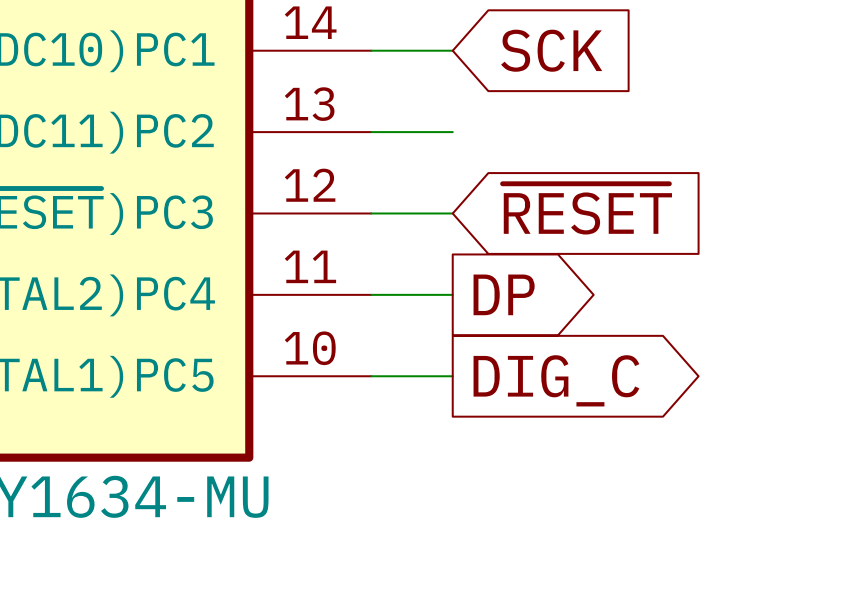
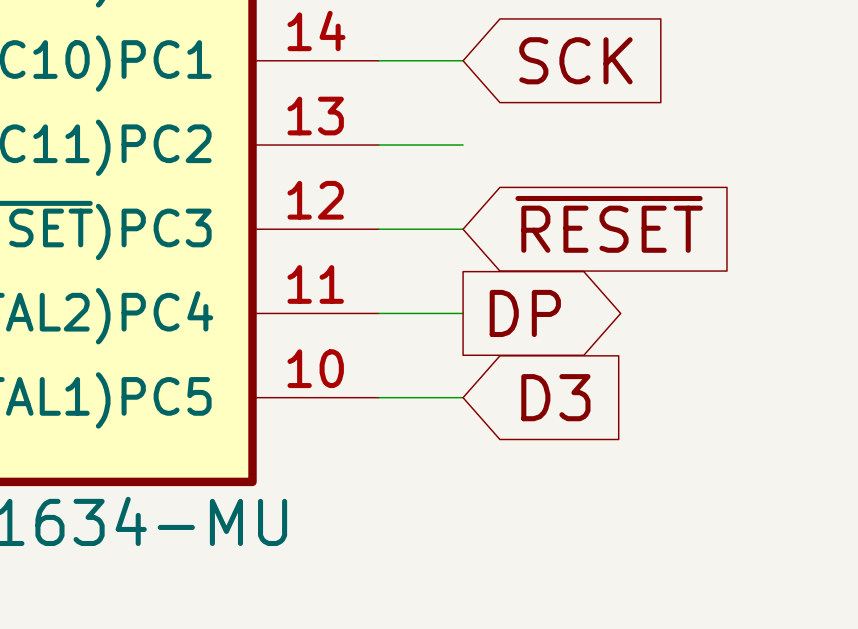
global label shape: output (556, 380) -> input (555, 397)
global label: DIG_C (556, 380) -> D3 (555, 397)

